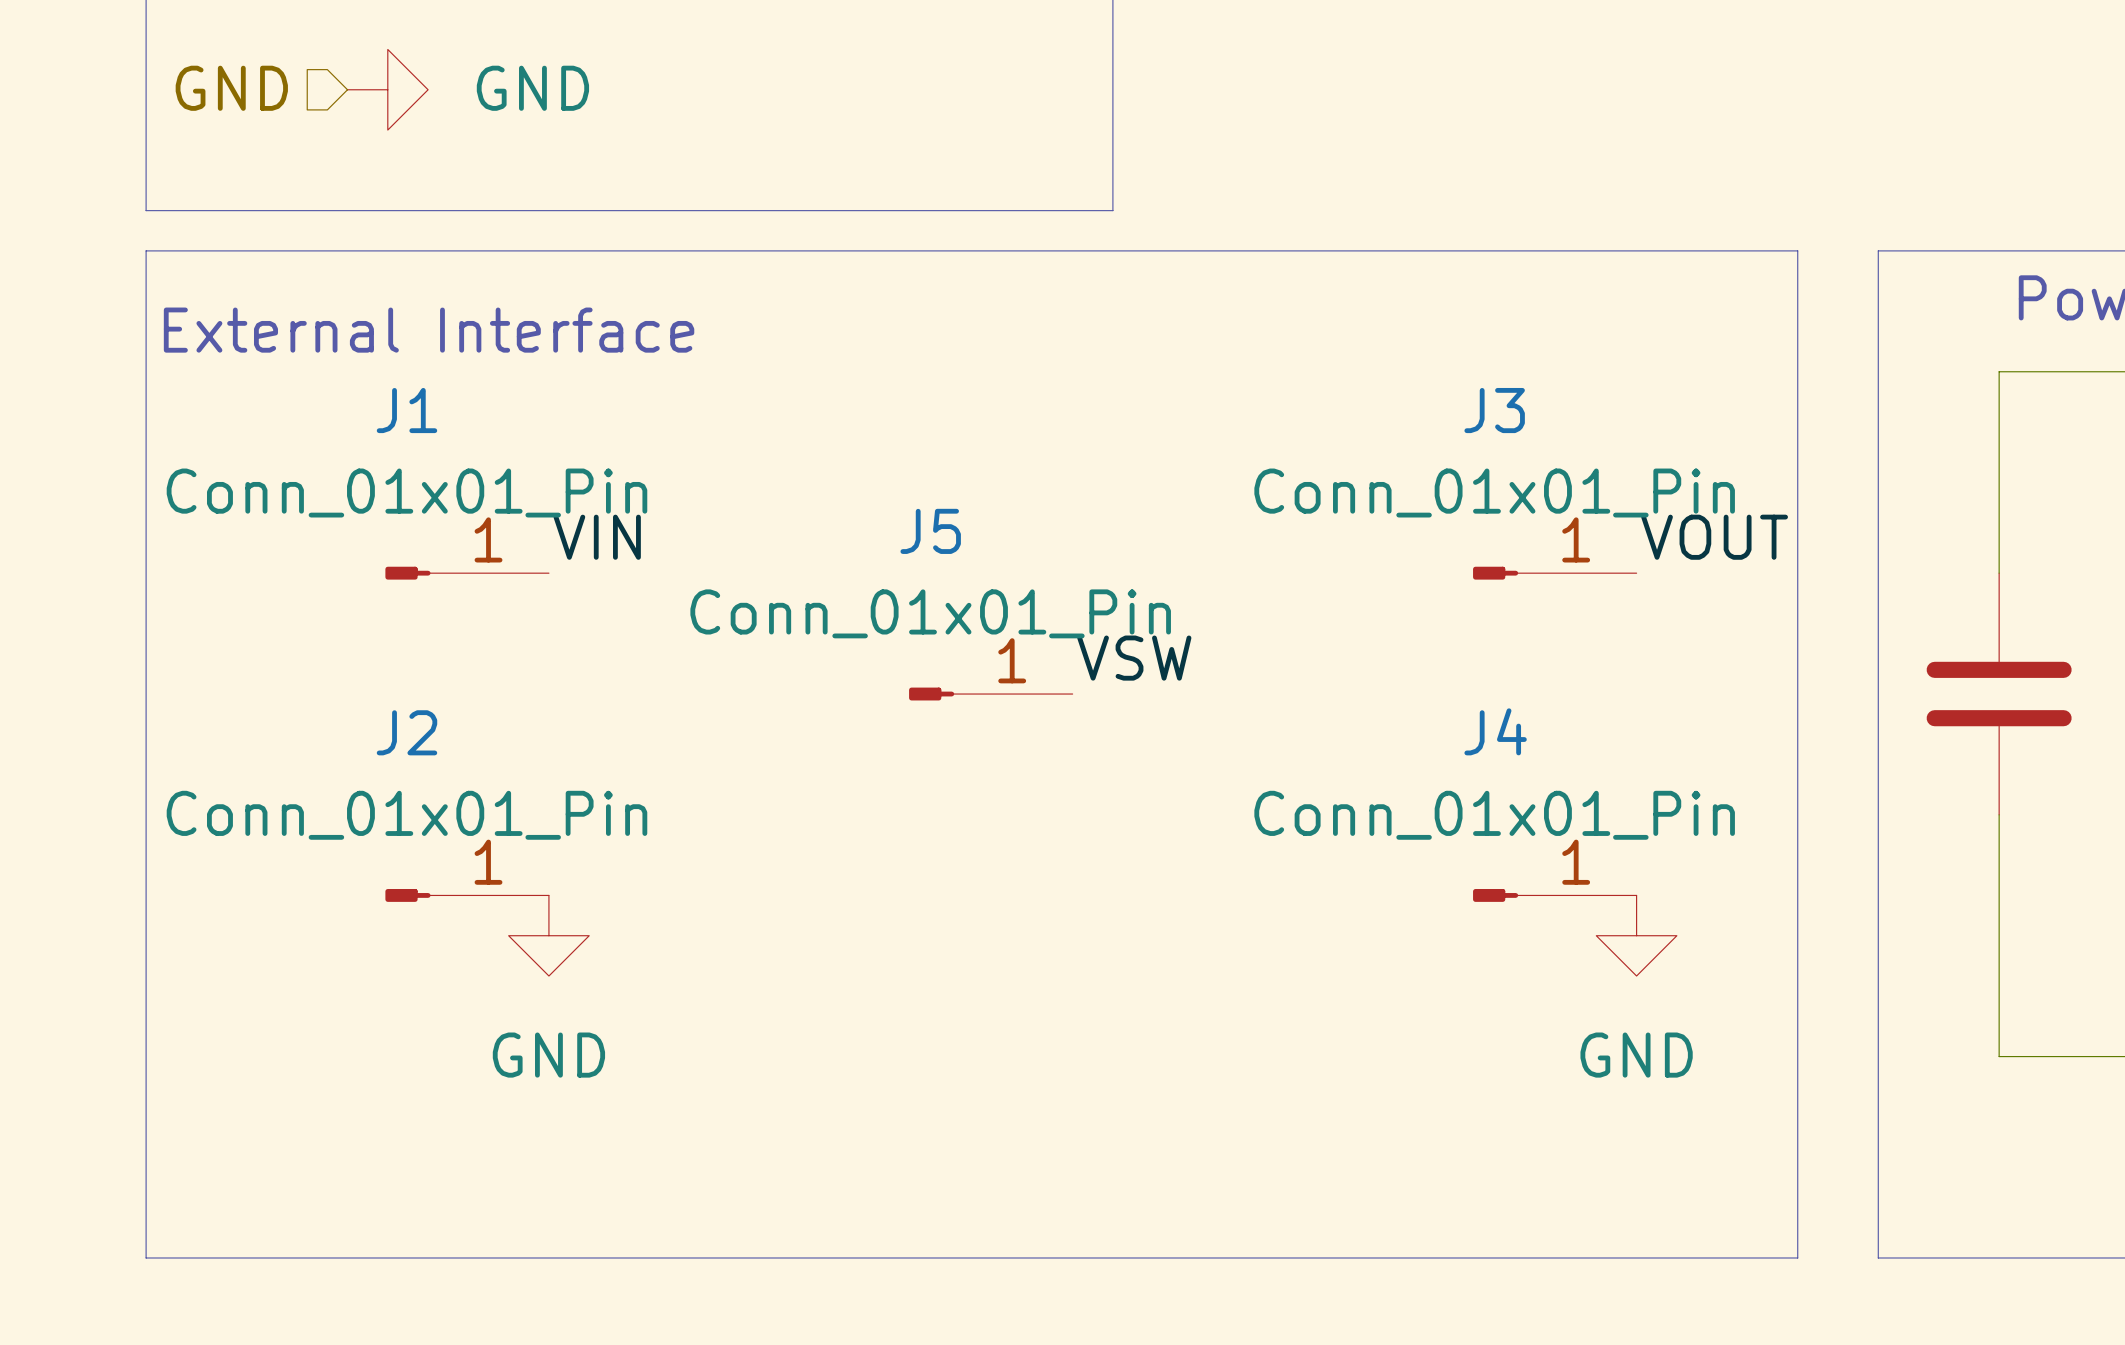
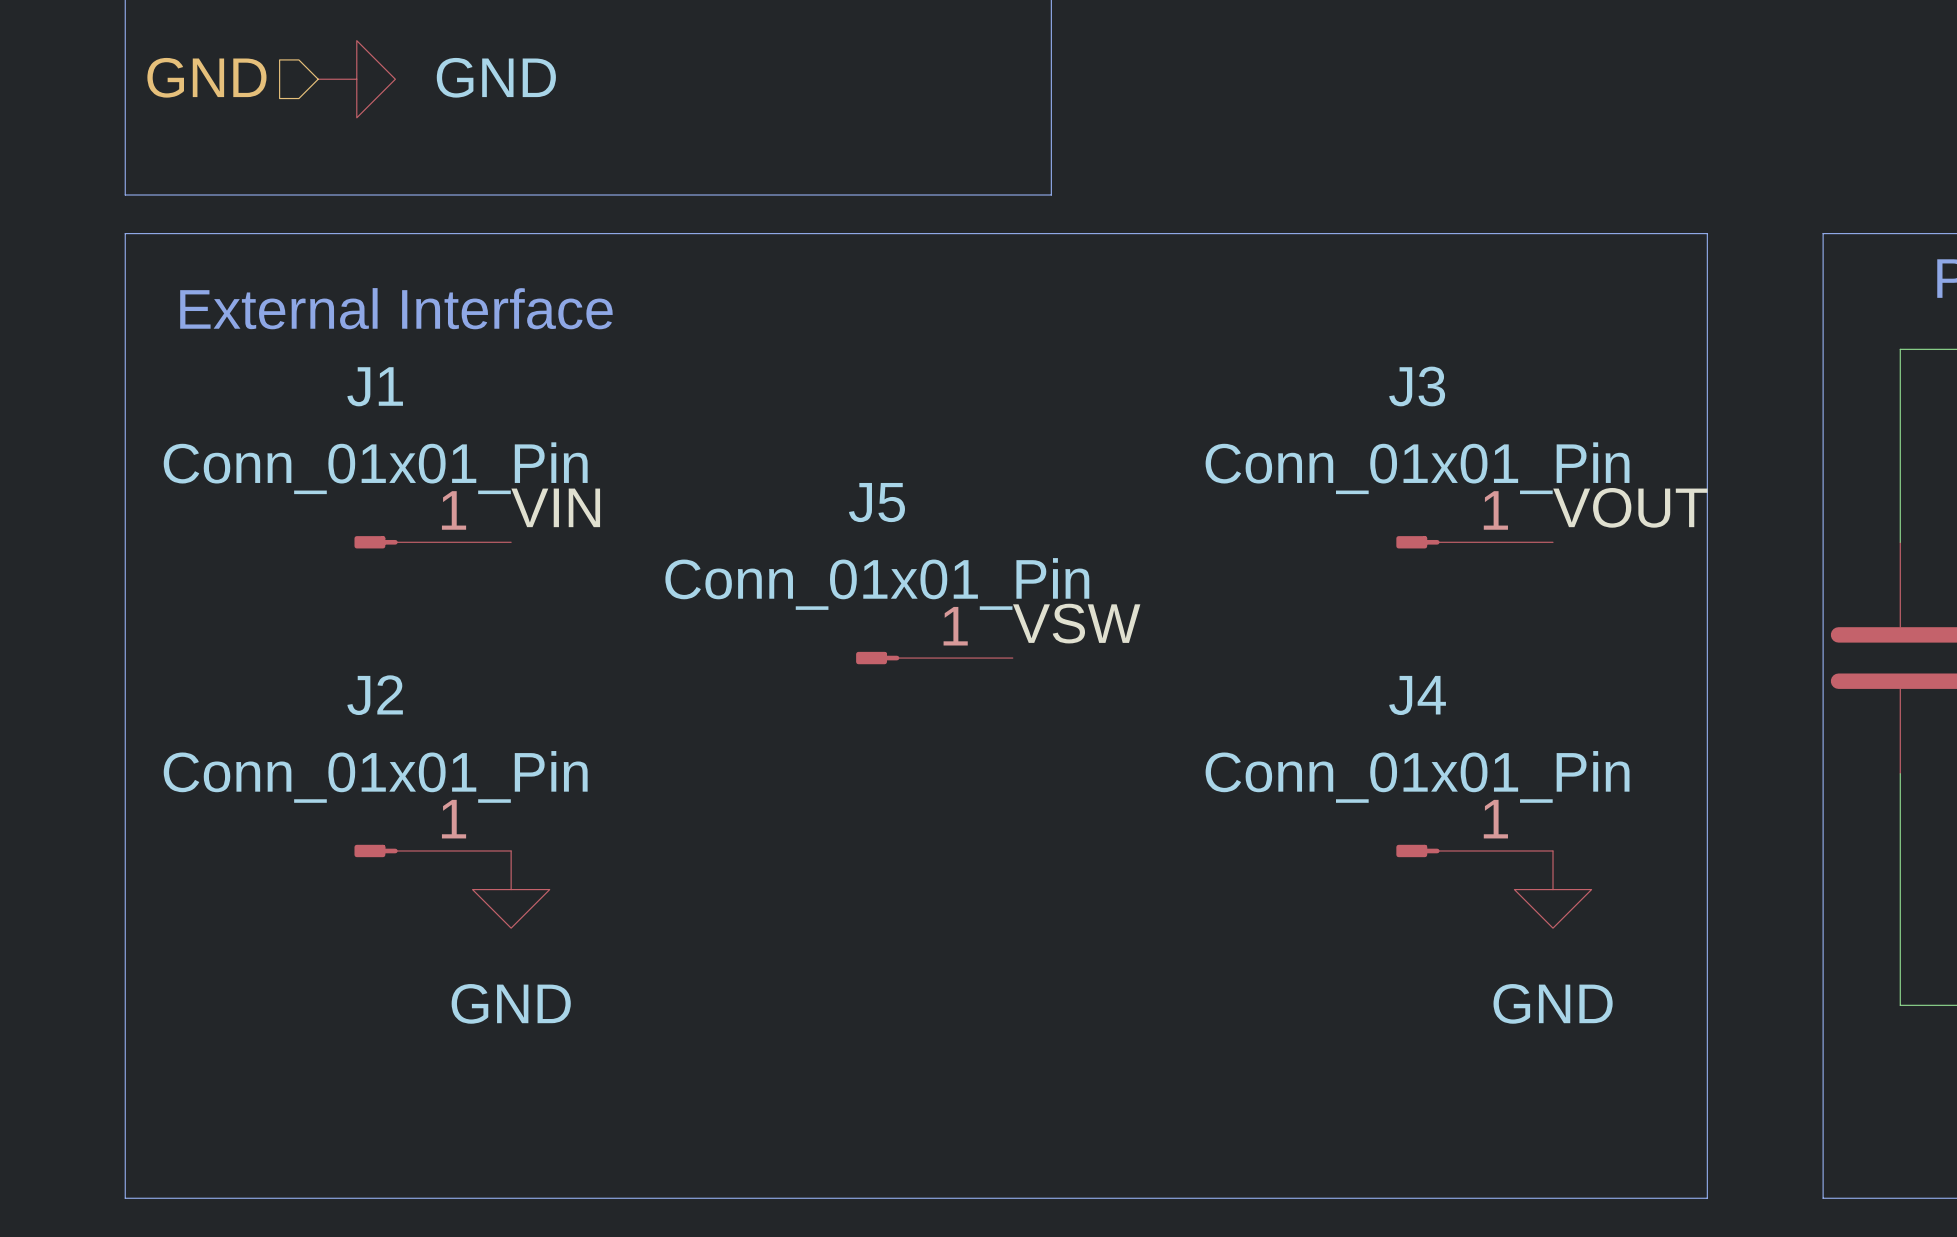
line: (1918, 250) (1878, 250) (1878, 1257) (1918, 1257) -> (1823, 233) (1823, 1198)

